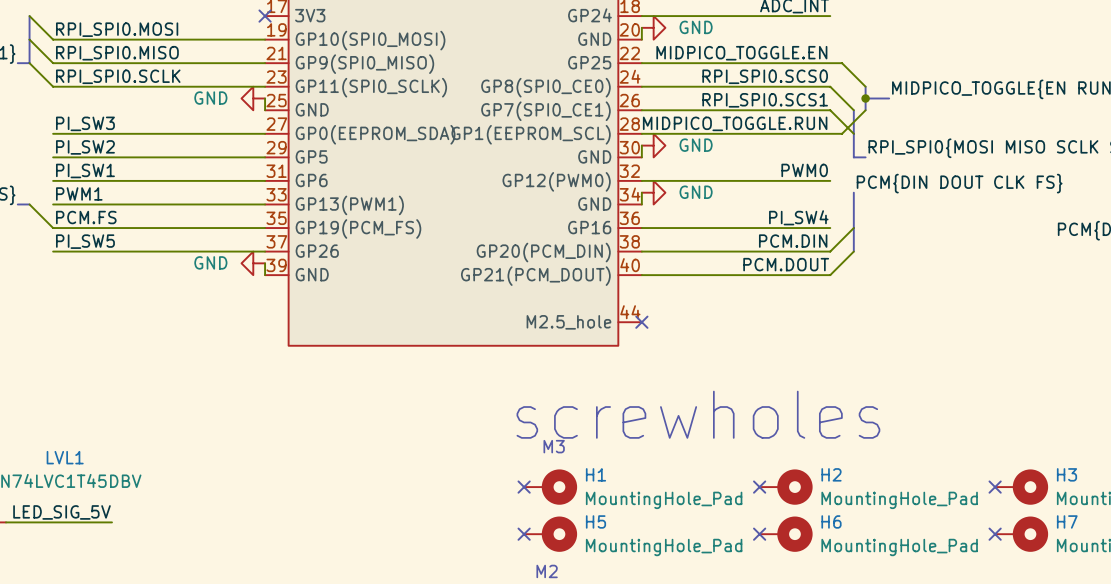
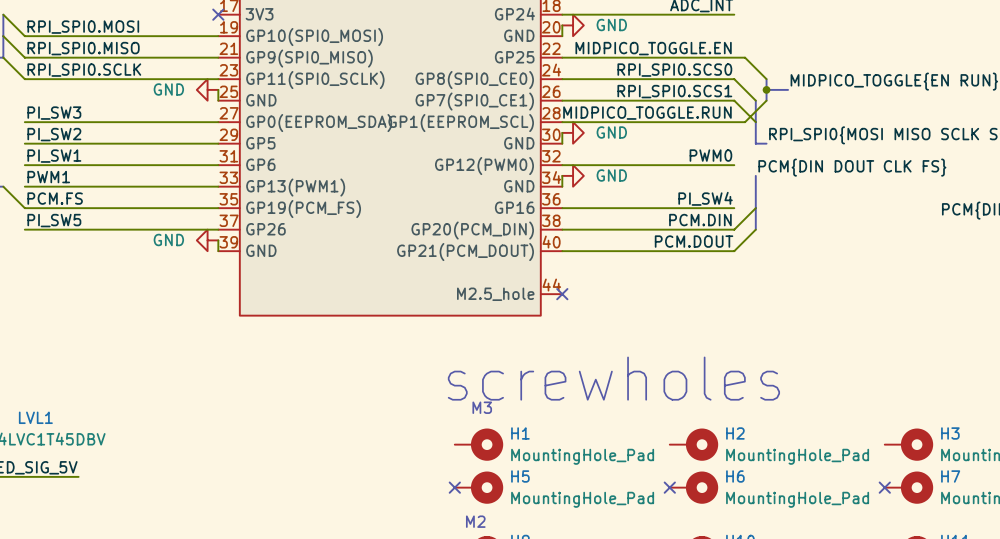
no-connect mark: (524, 487) -> none
no-connect mark: (759, 487) -> none
no-connect mark: (995, 487) -> none

